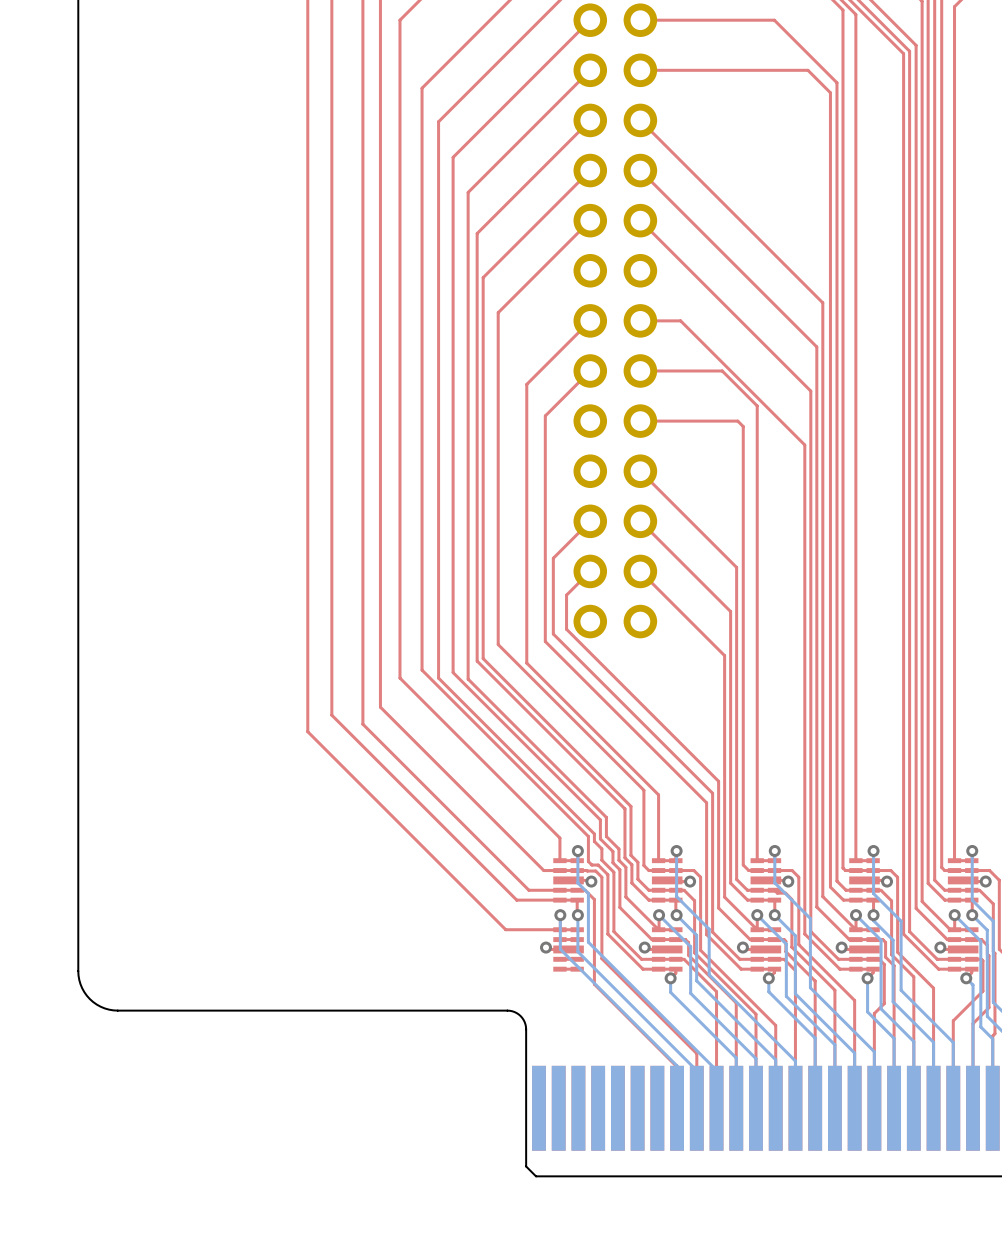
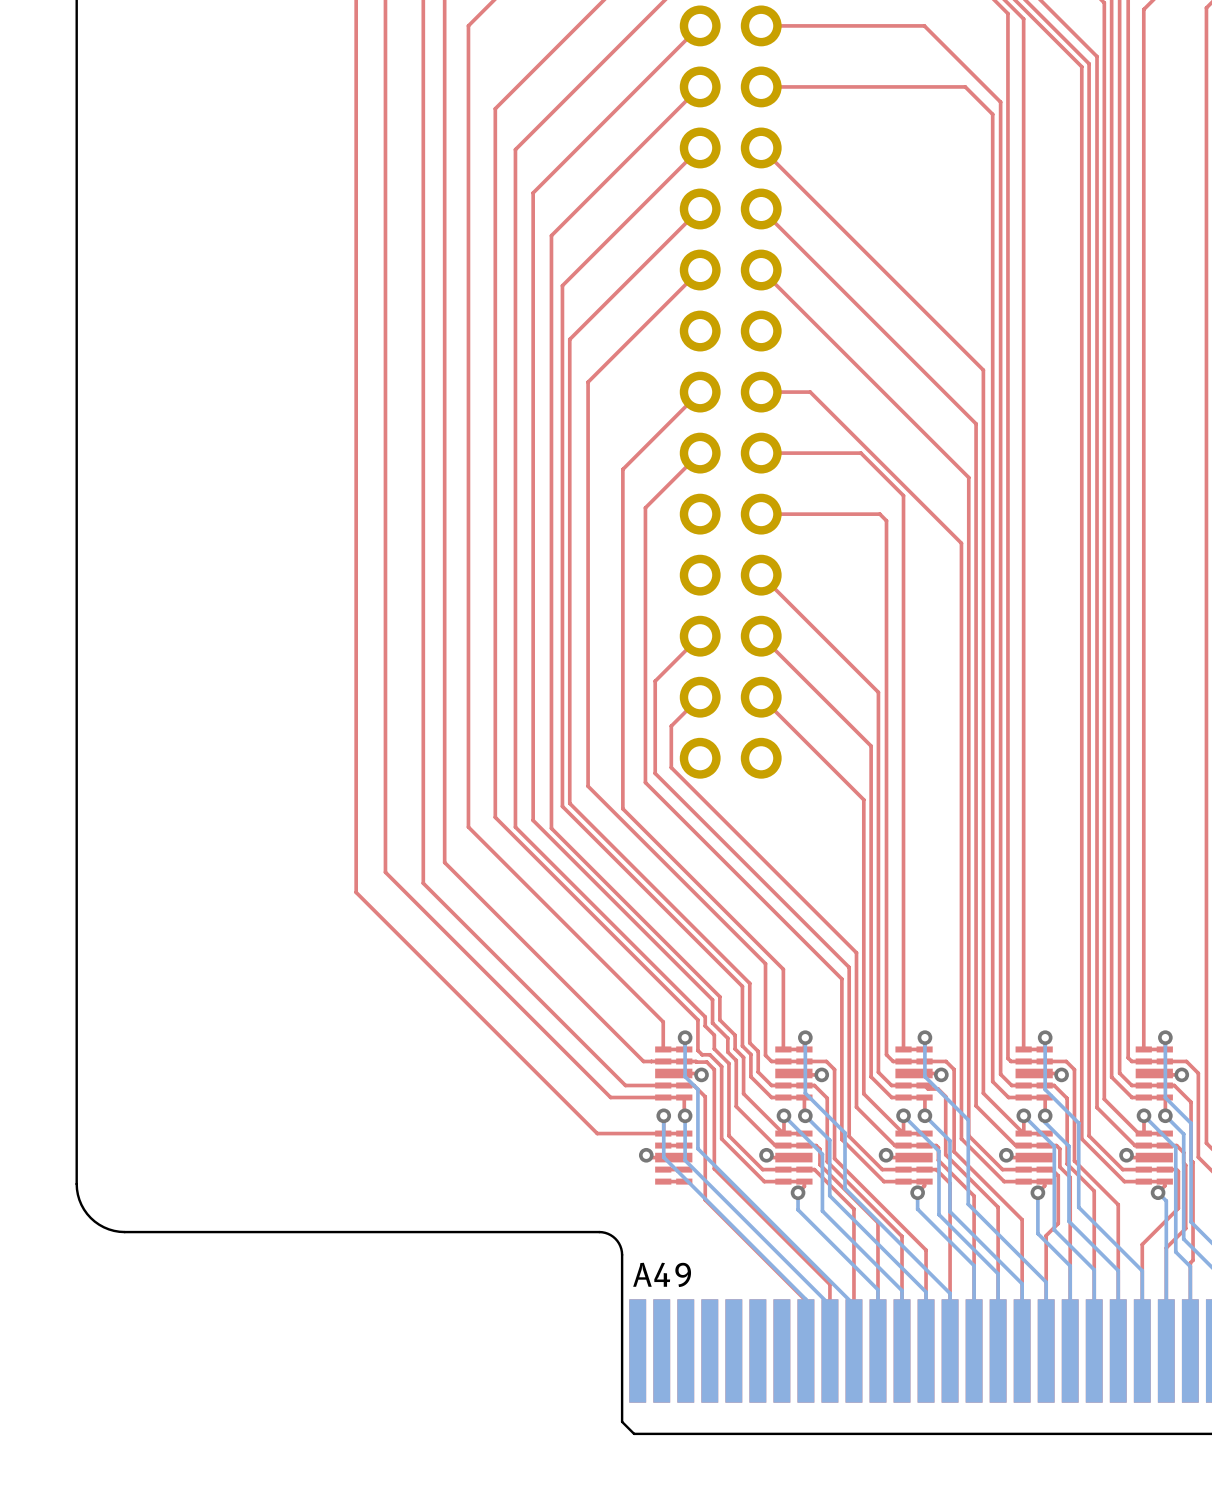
part text: none -> A49 (662, 1274)

